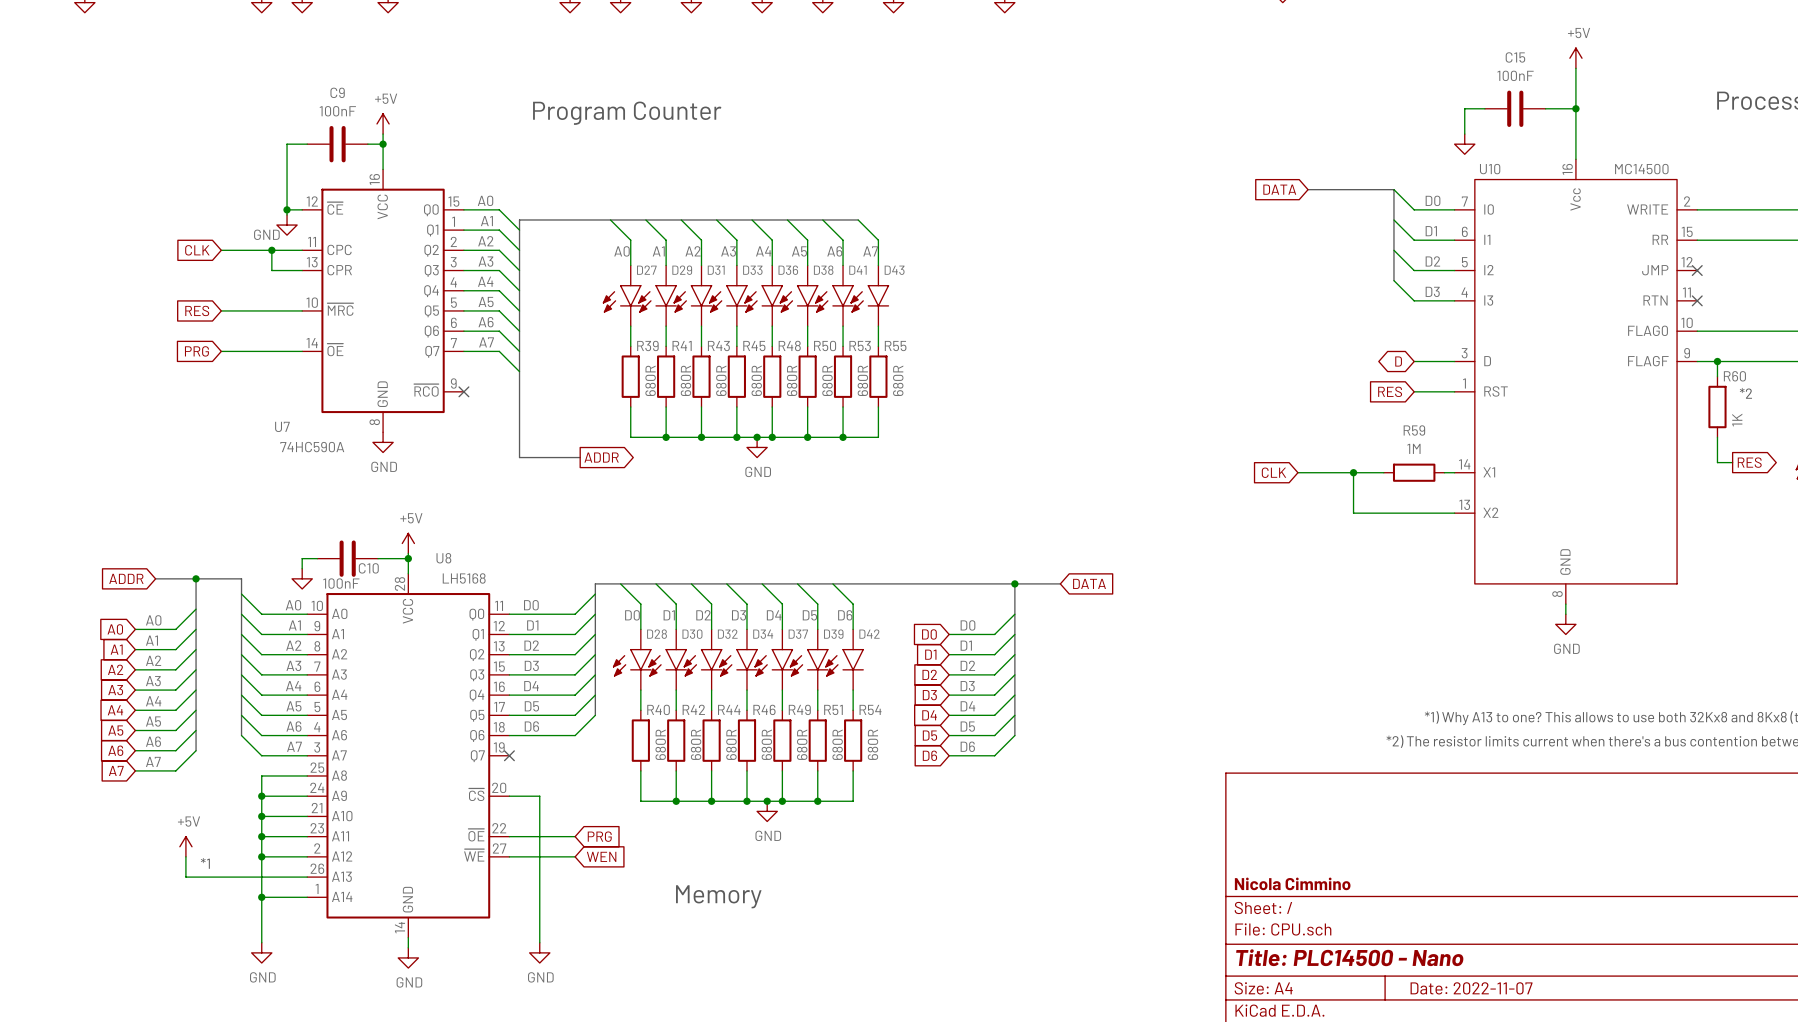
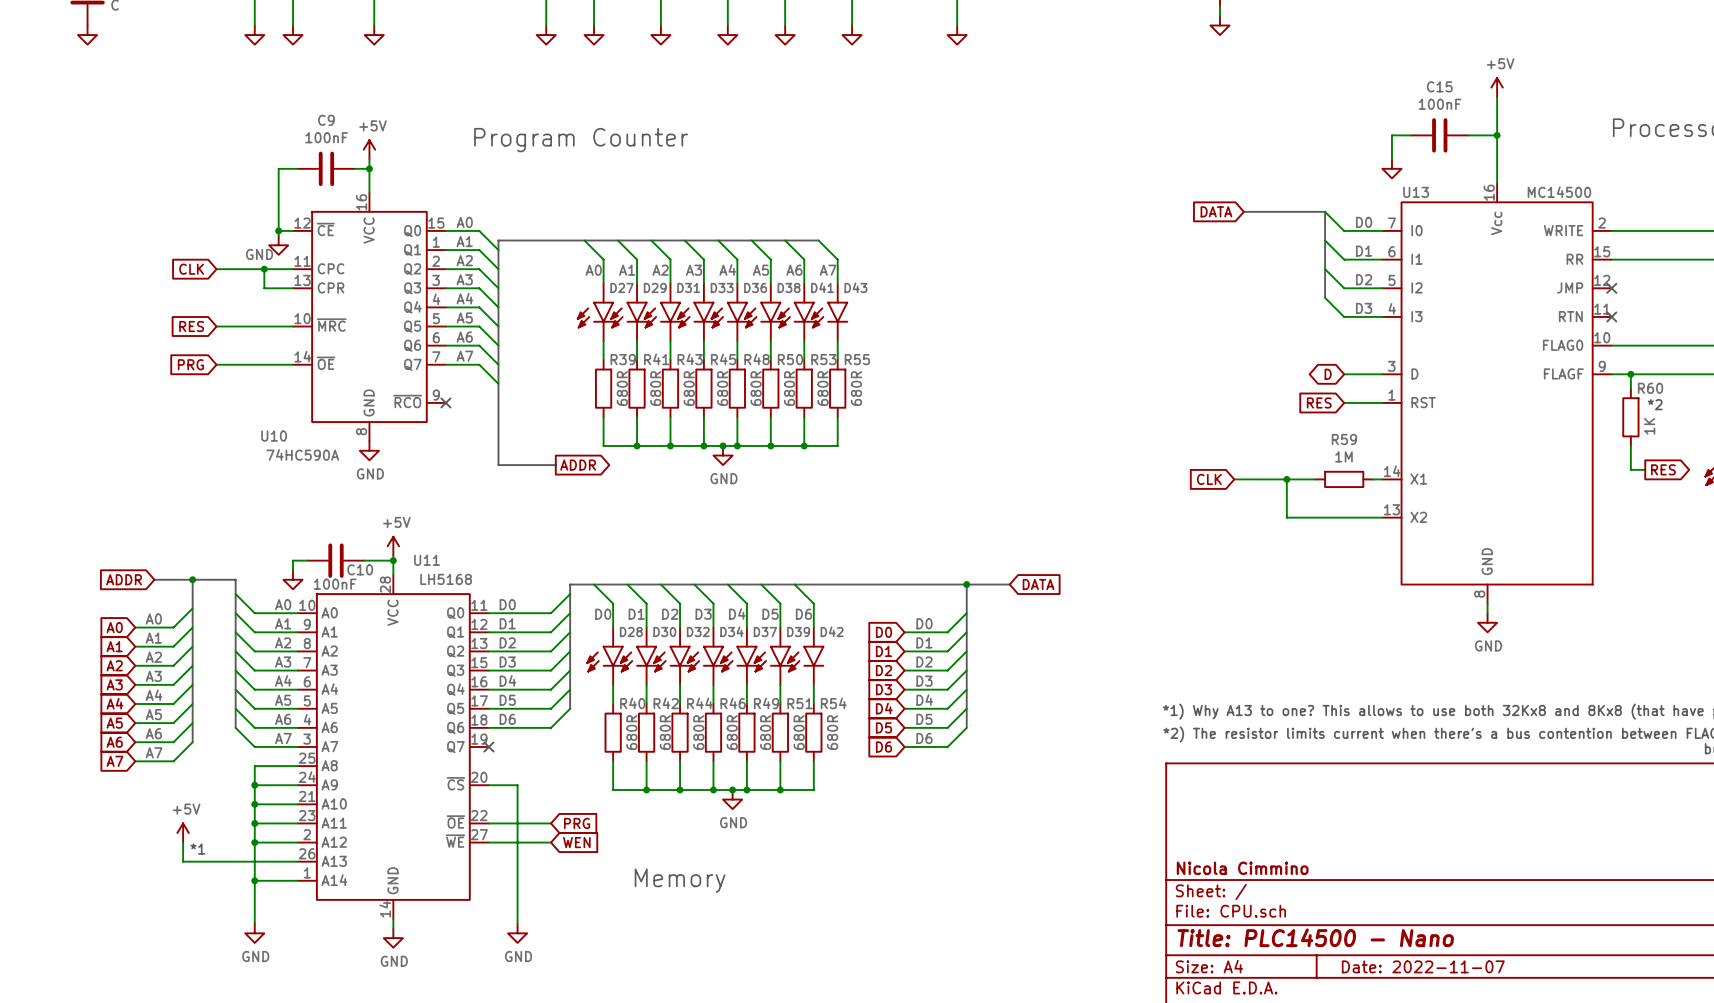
U10 name: U10 (1490, 169) -> U13 (1416, 192)
U7 name: U7 (282, 426) -> U10 (274, 436)
U8 name: U8 (443, 558) -> U11 (427, 560)

